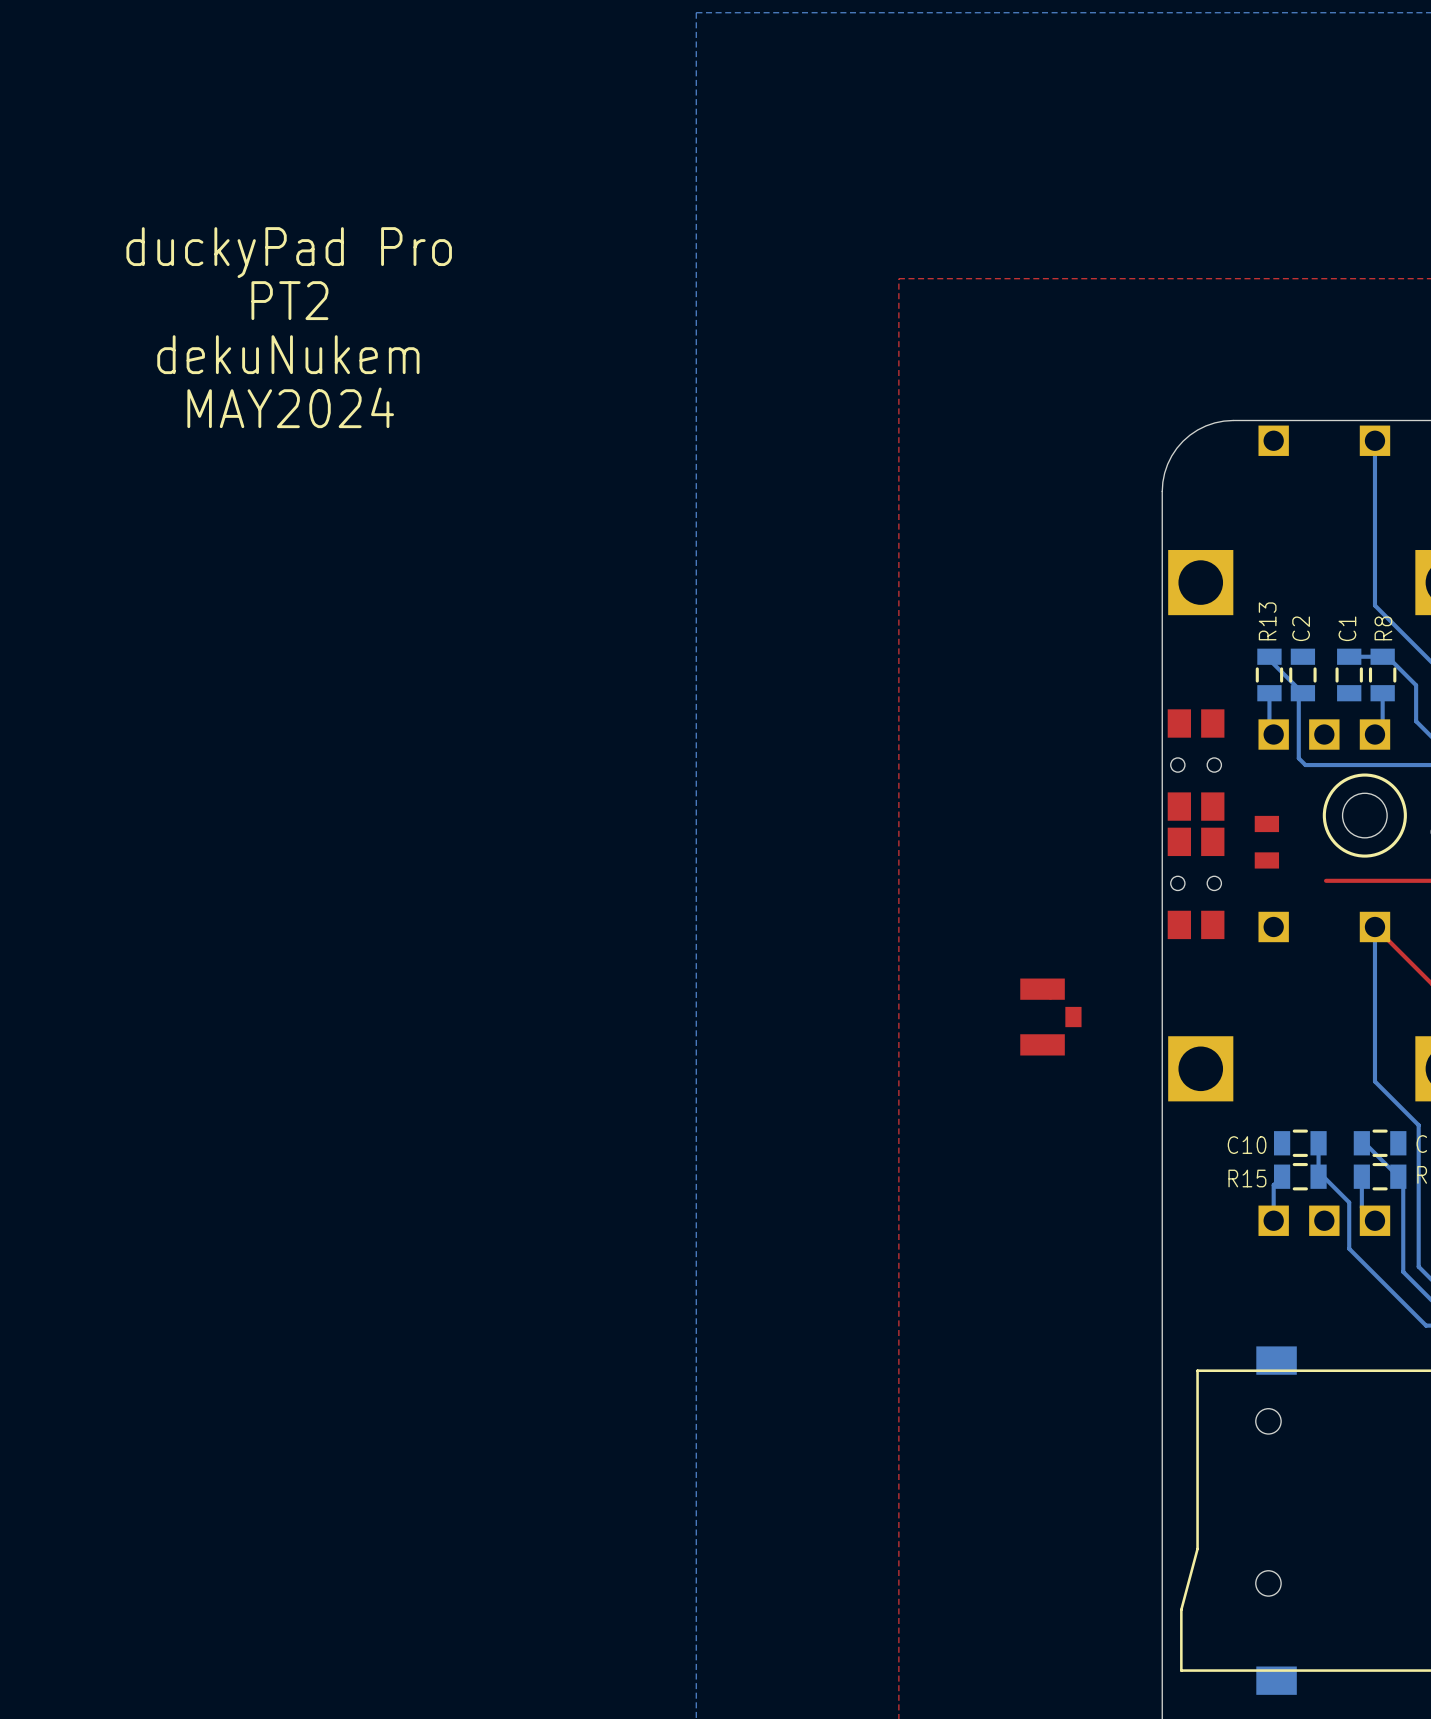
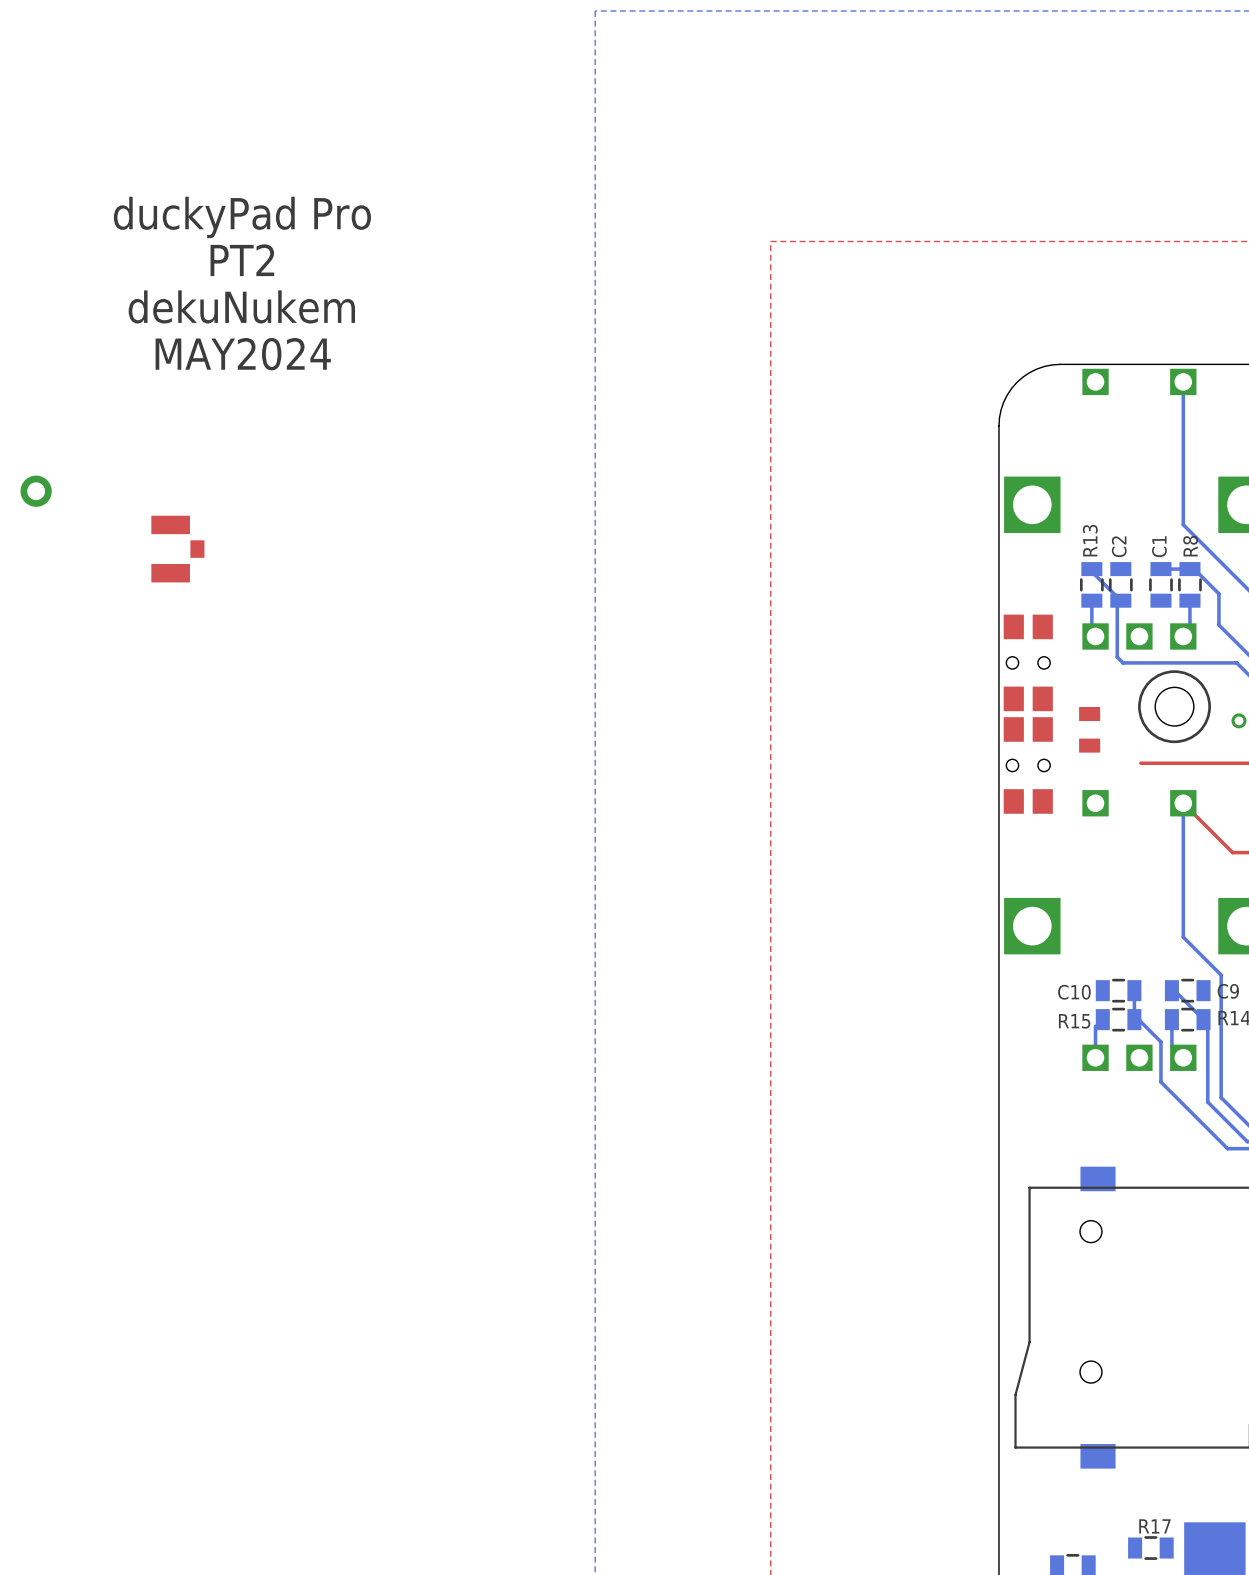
part: none -> (36, 491)
part: none -> (177, 549)
part: (1050, 1017) -> none

